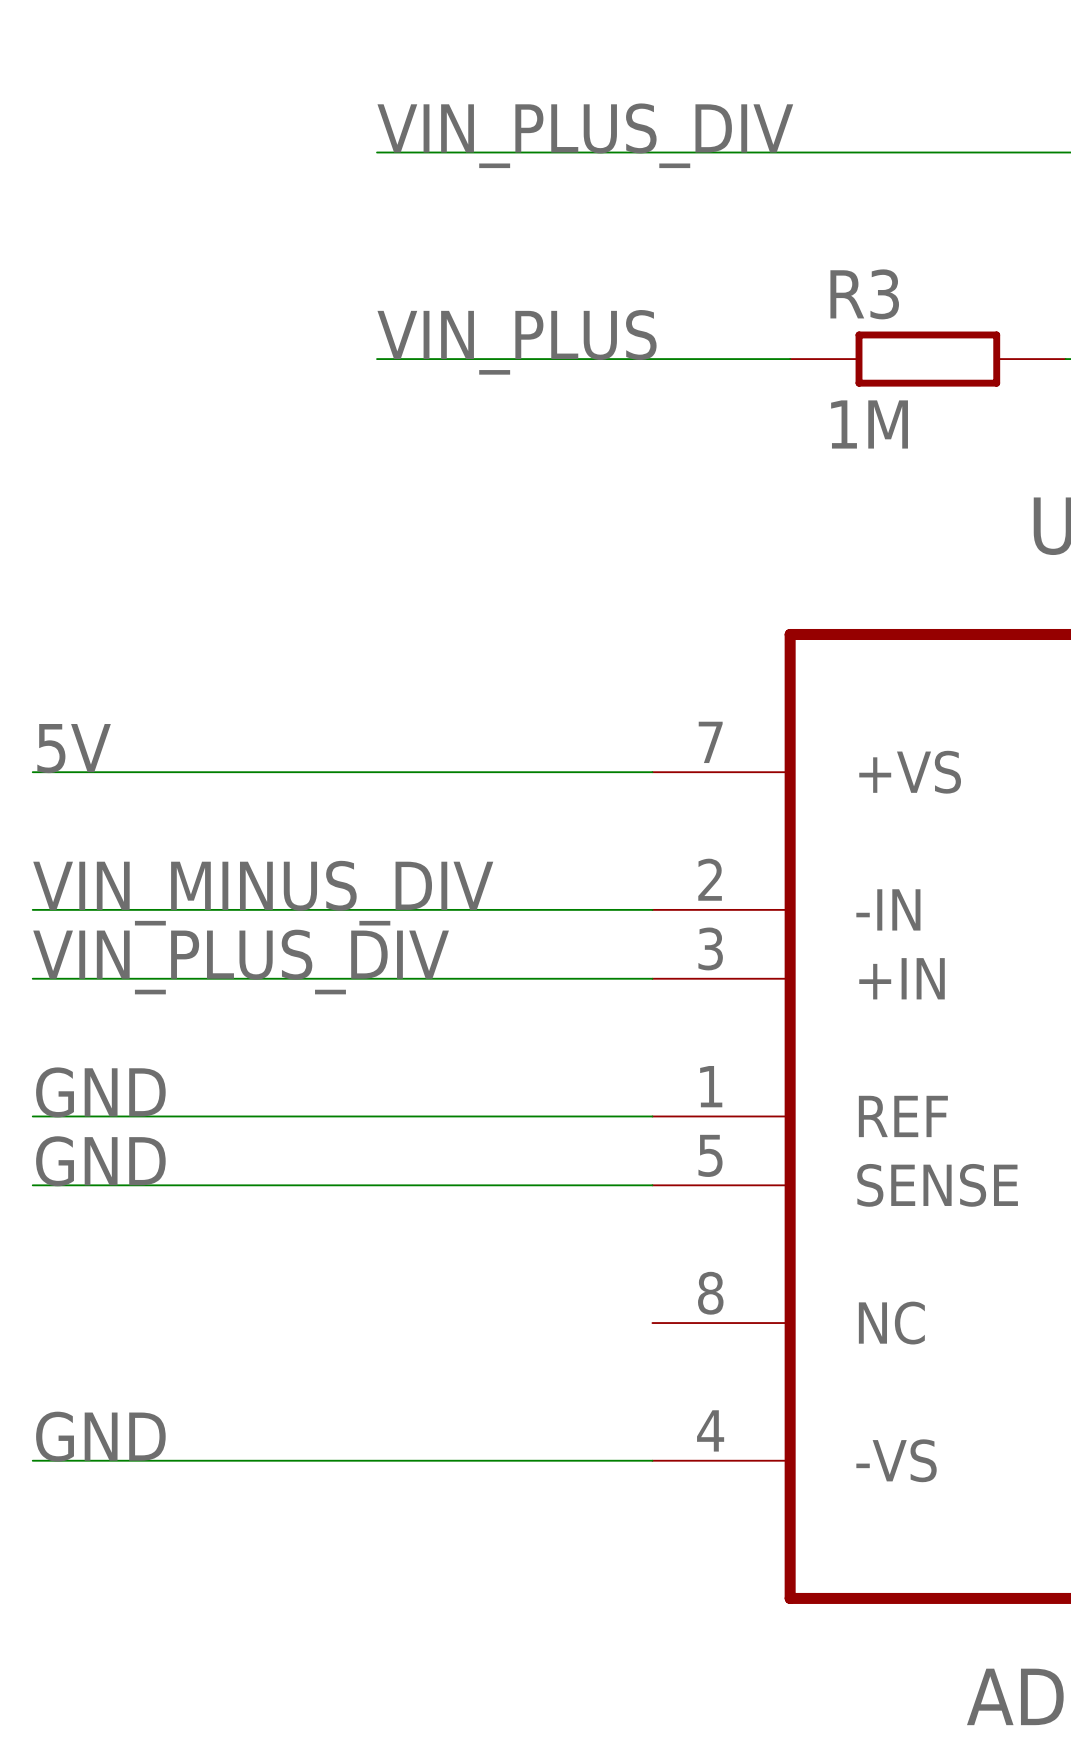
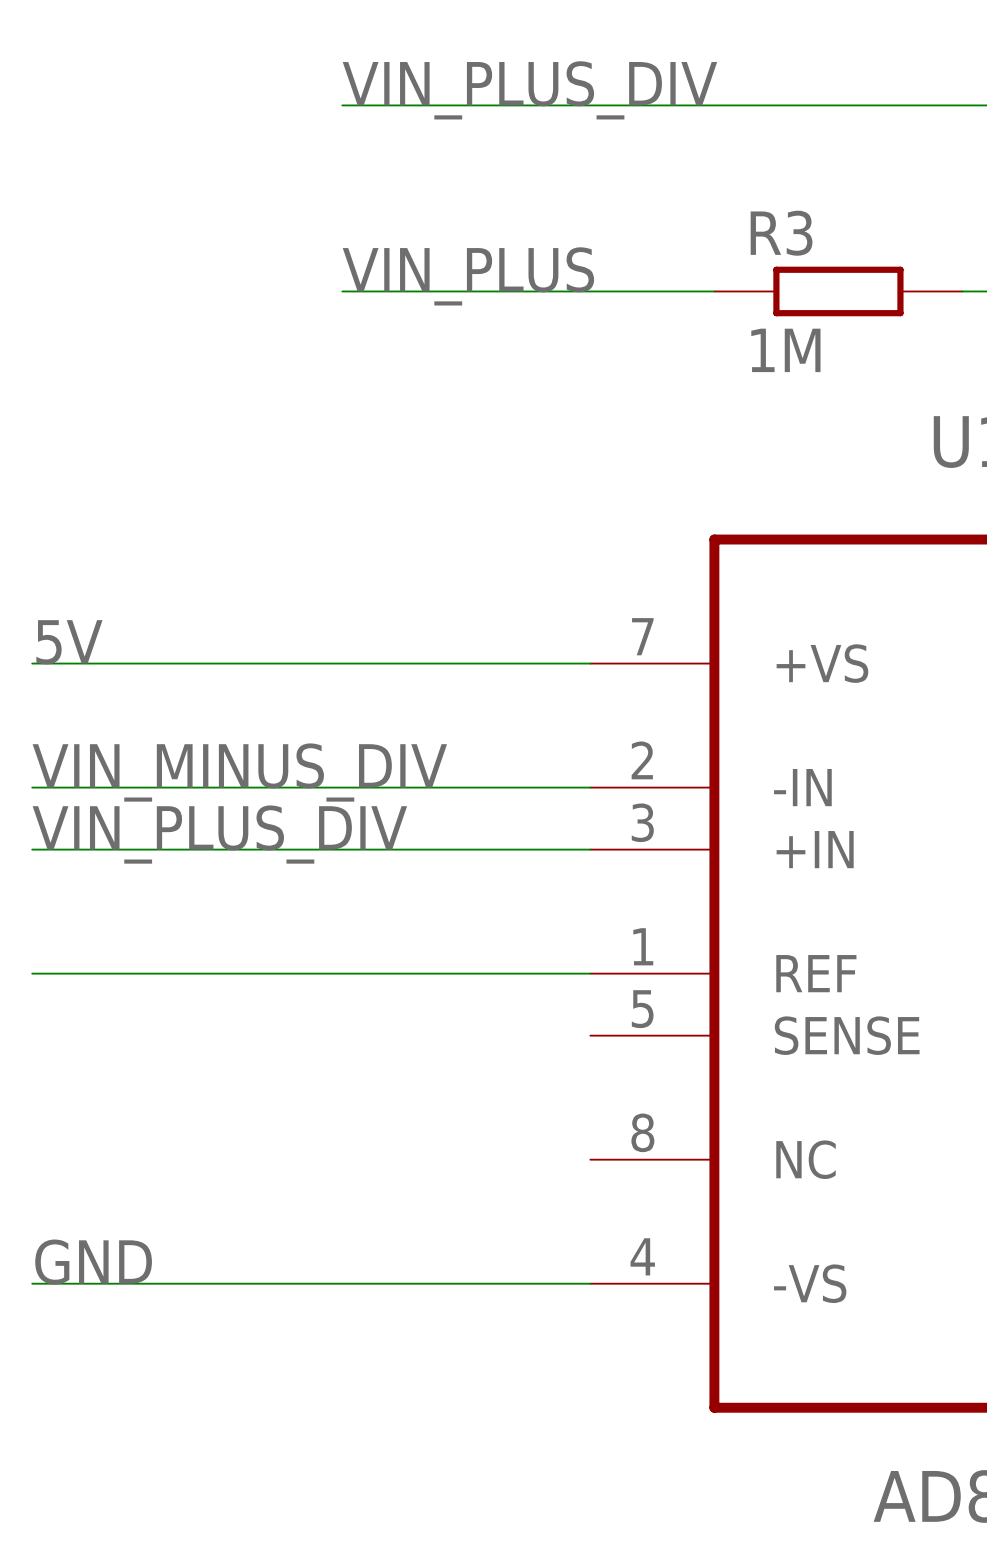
label: GND (100, 1092) -> none
label: GND (100, 1161) -> none
wire: (32, 1185) (652, 1185) -> none

